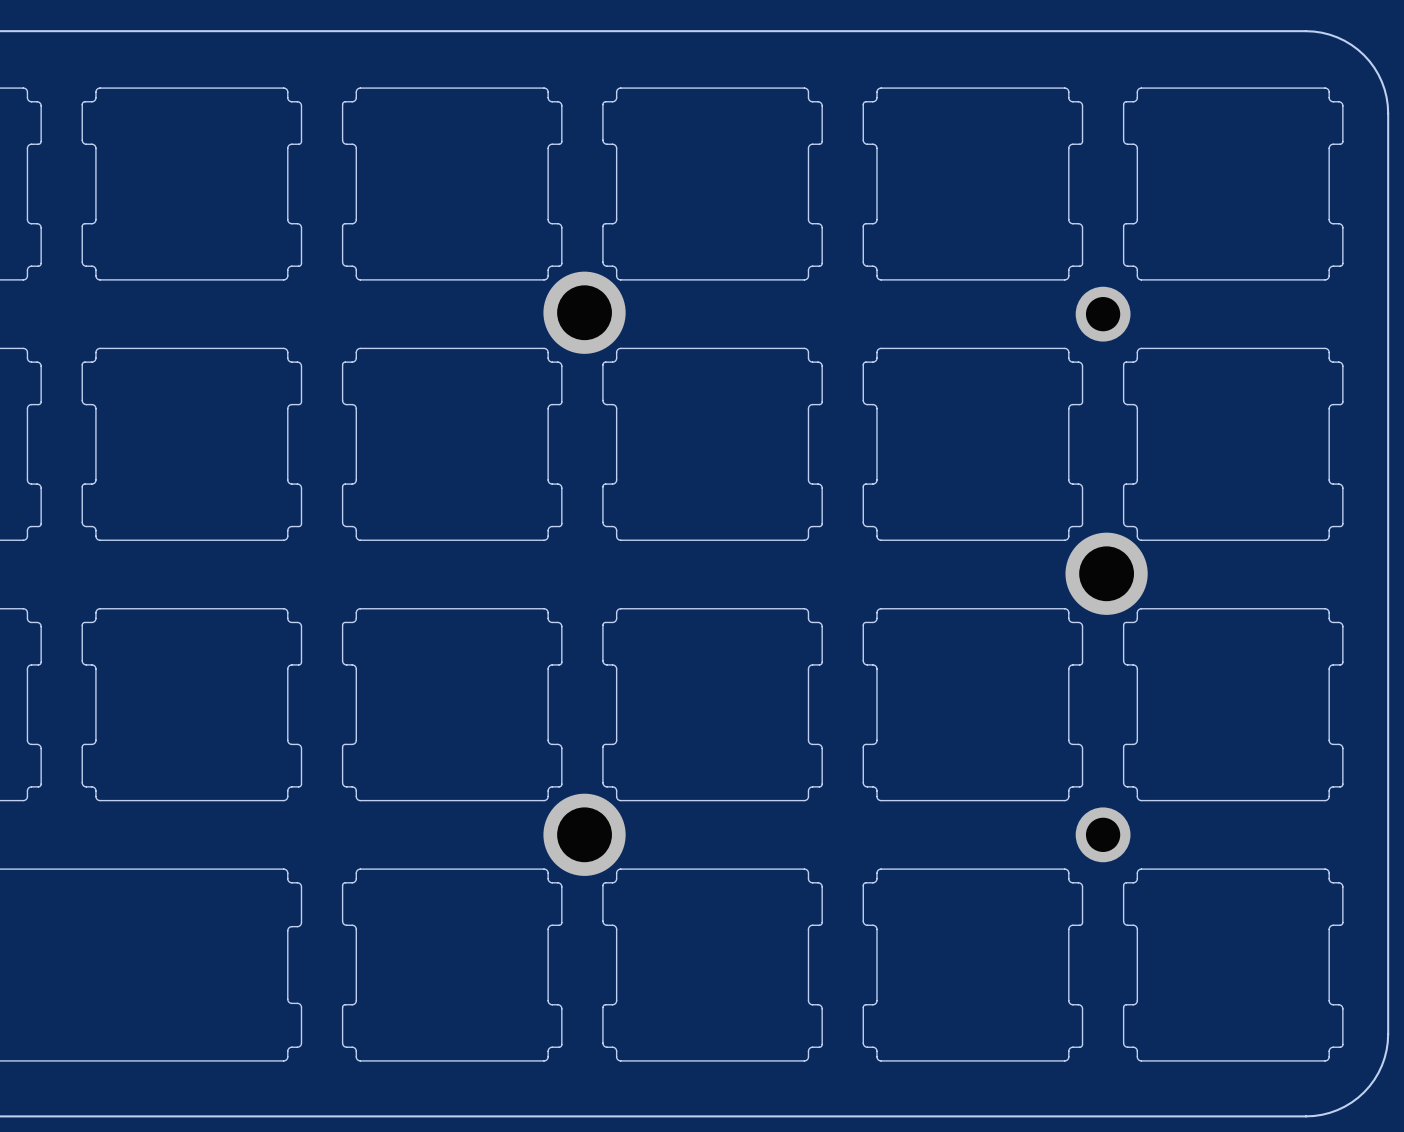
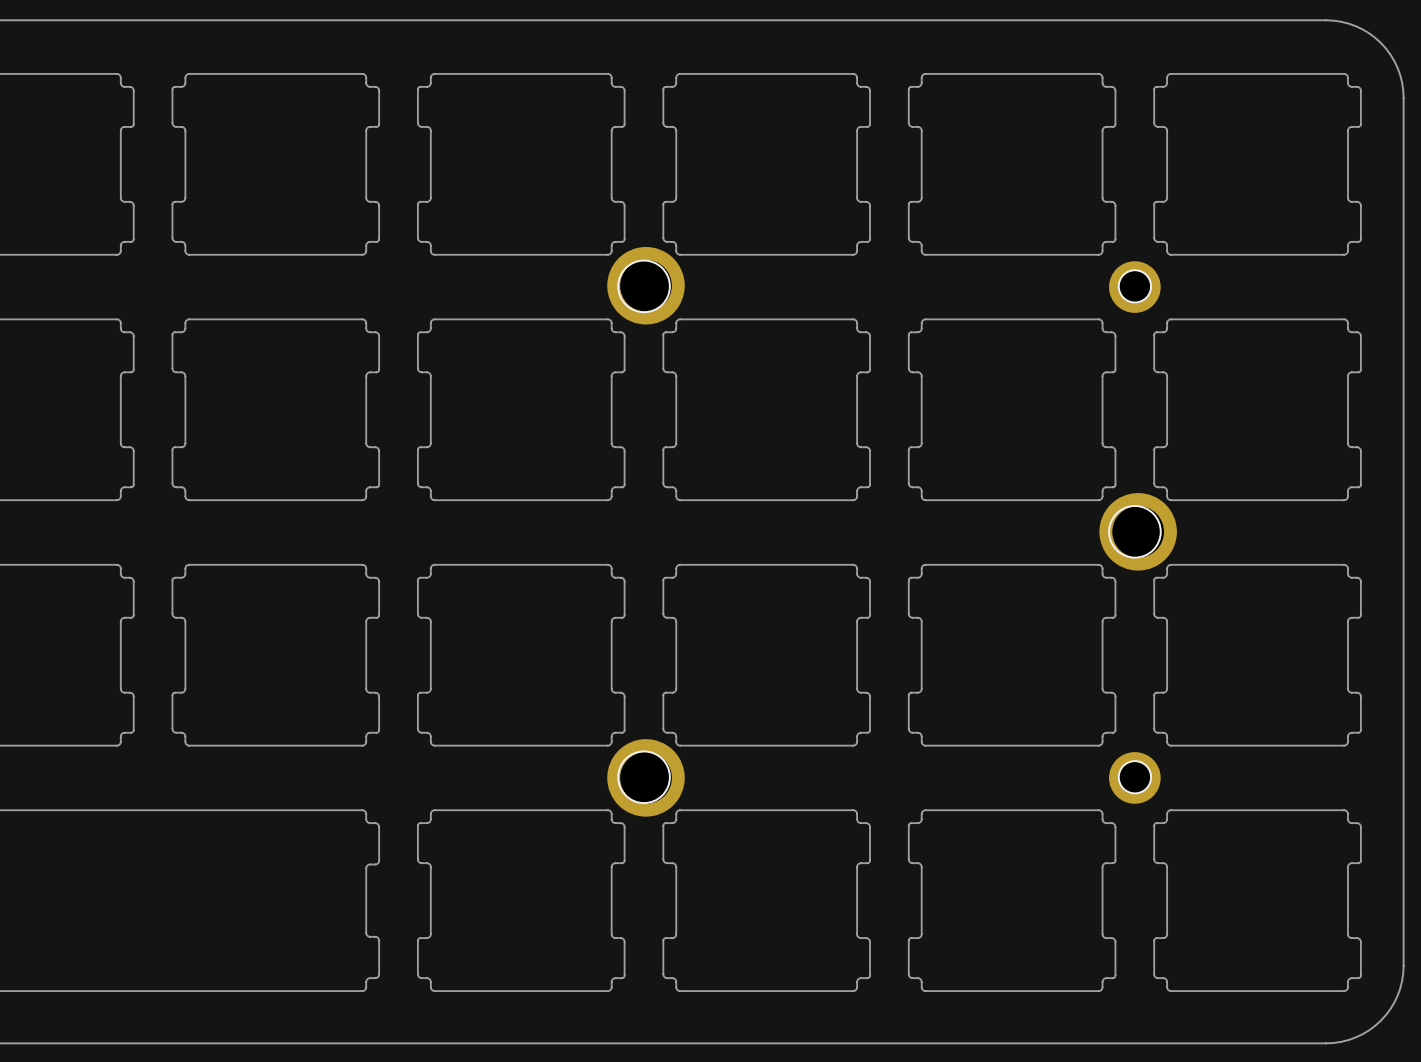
drawing: none -> [617, 259, 671, 314]
drawing: none -> [1117, 269, 1153, 304]
drawing: none -> [1108, 505, 1162, 559]
drawing: none -> [617, 750, 671, 805]
drawing: none -> [1117, 760, 1153, 795]

